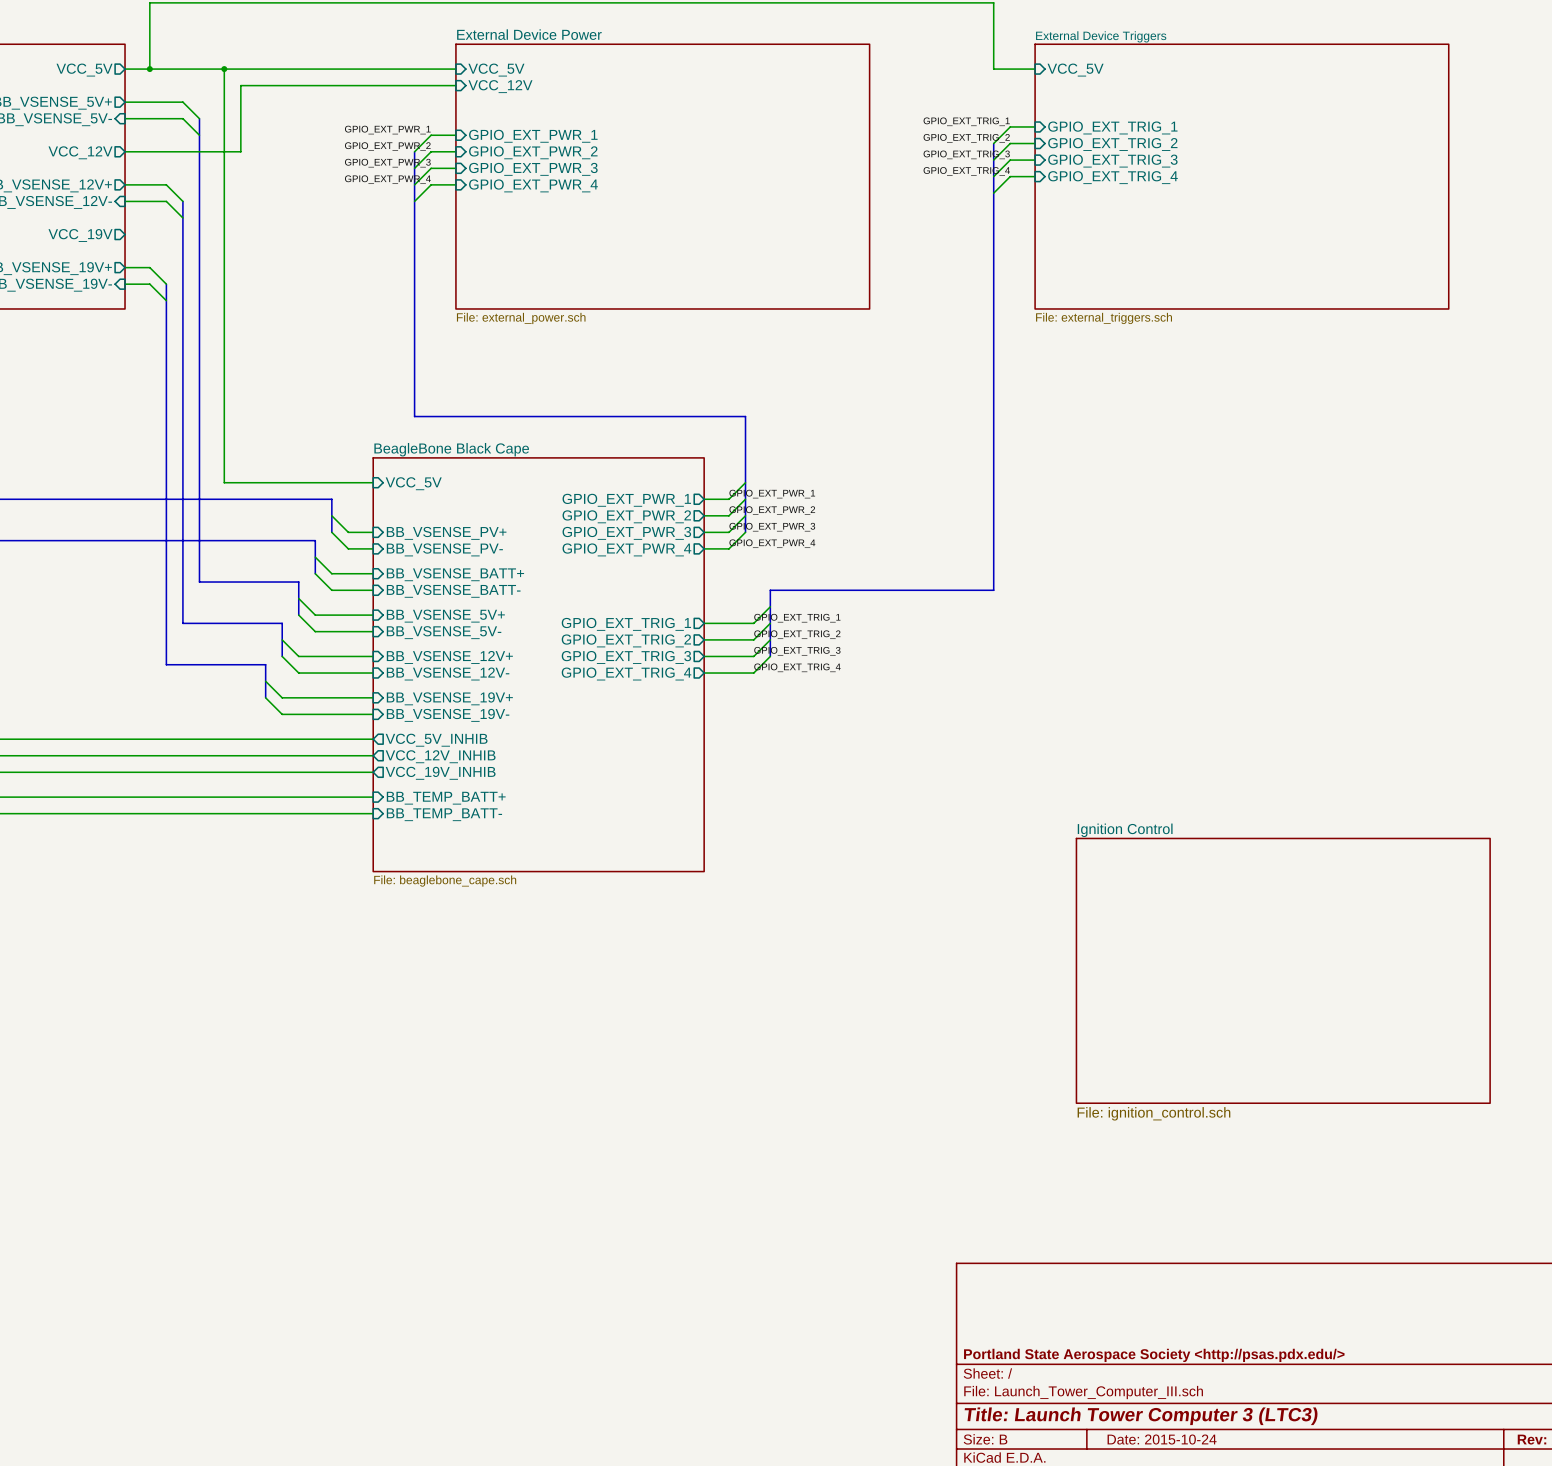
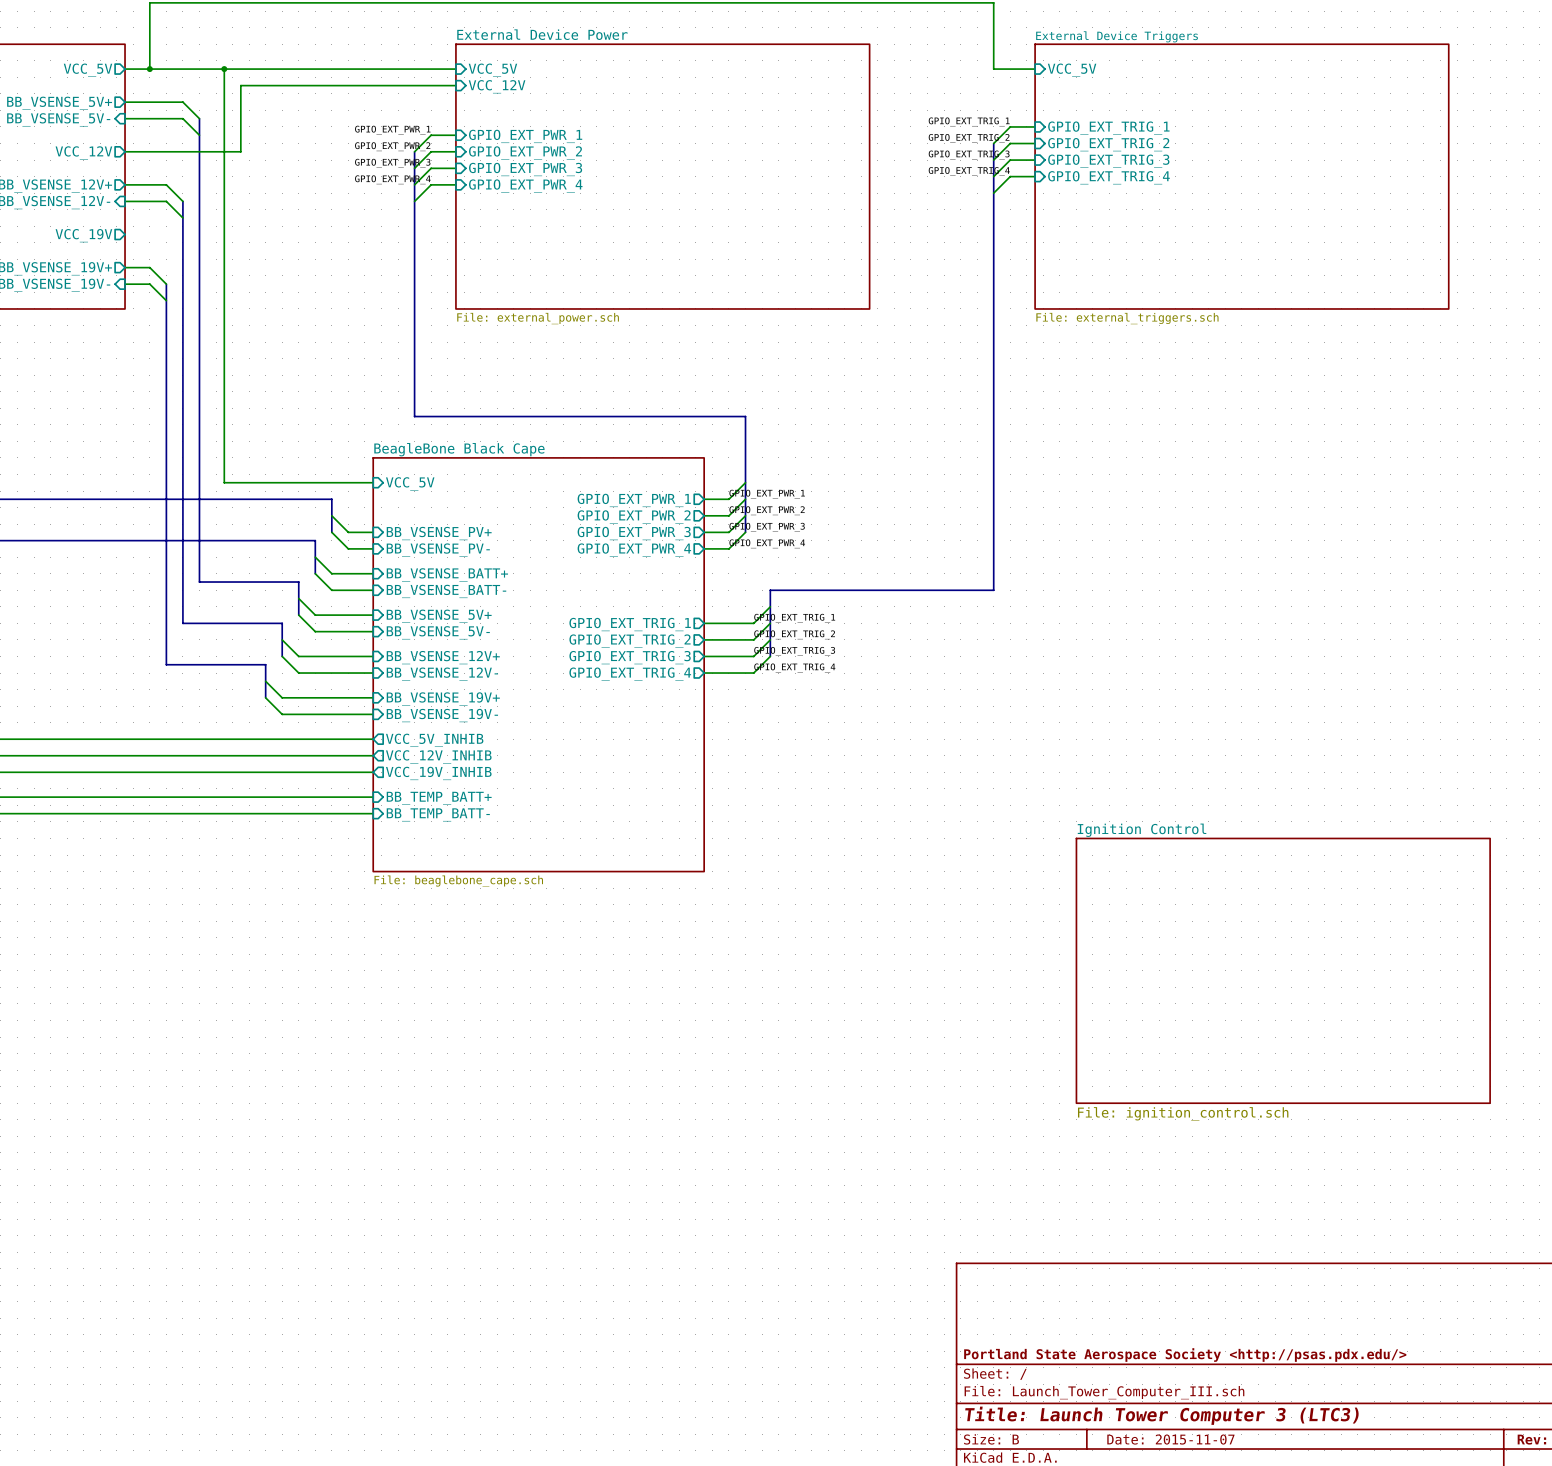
title block: Date: 2015-10-24 (1162, 1439) -> Date: 2015-11-07 (1170, 1439)

